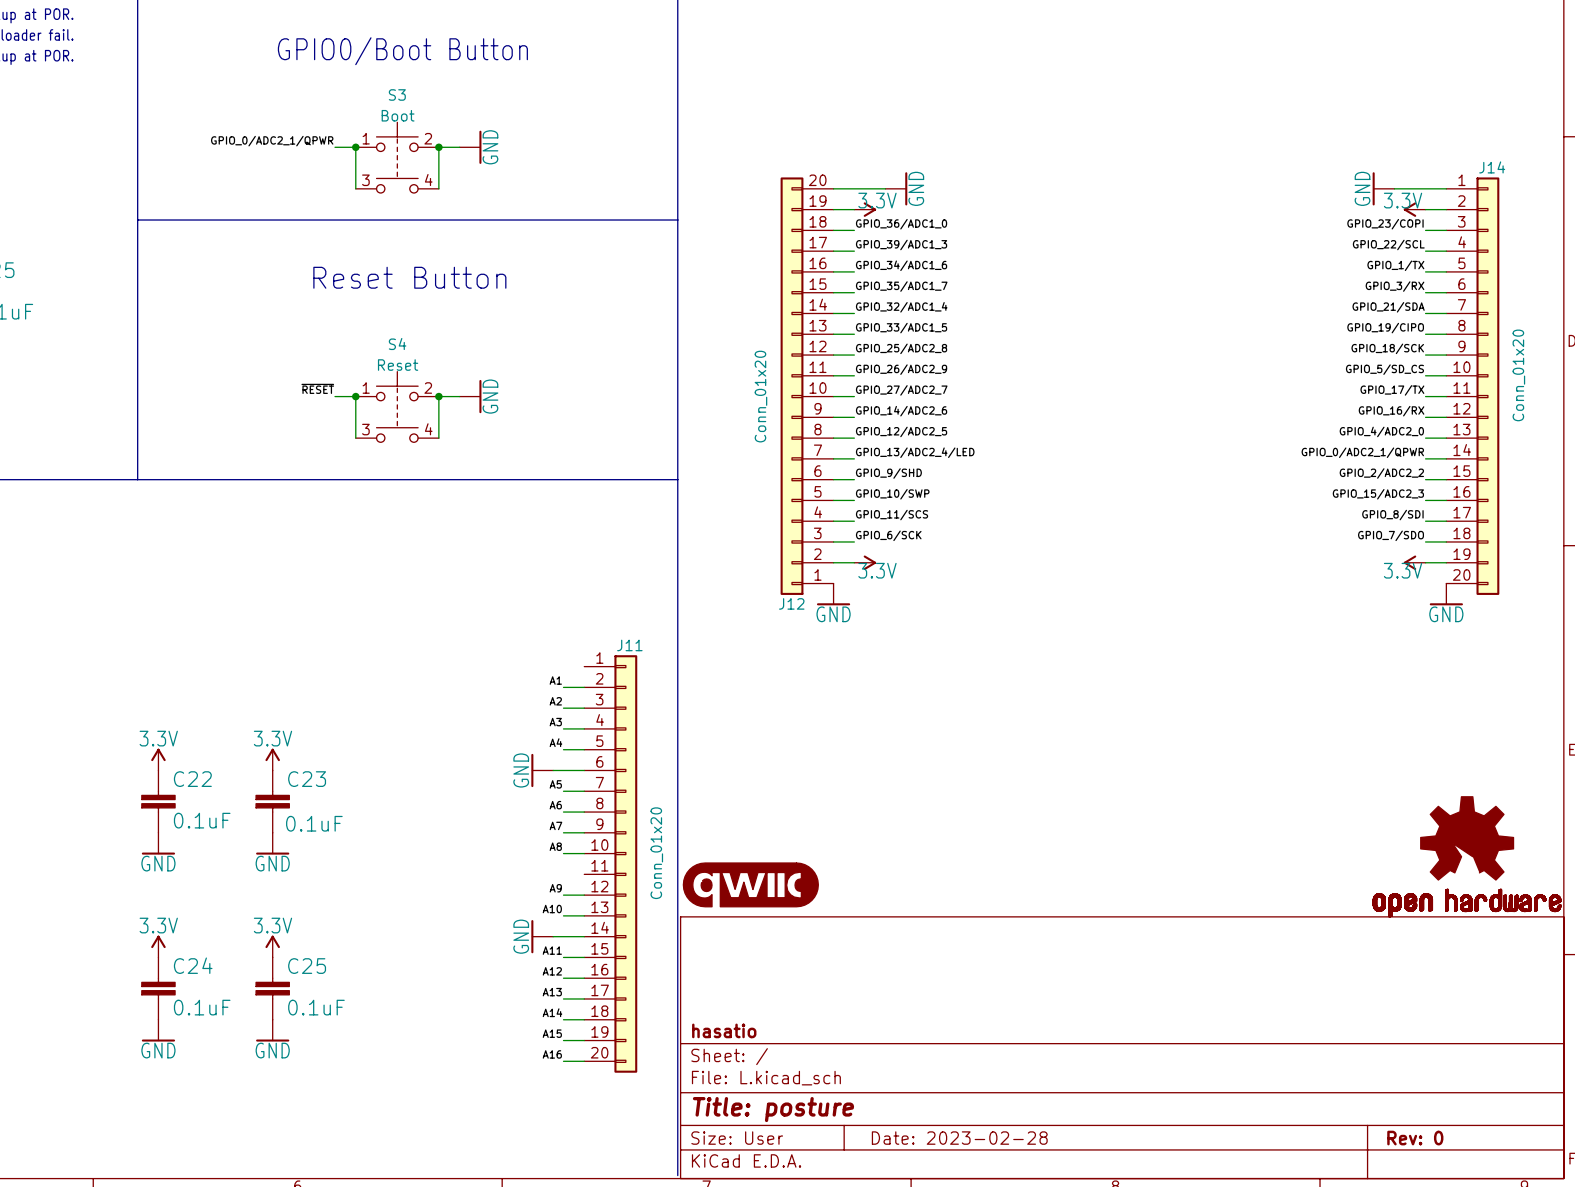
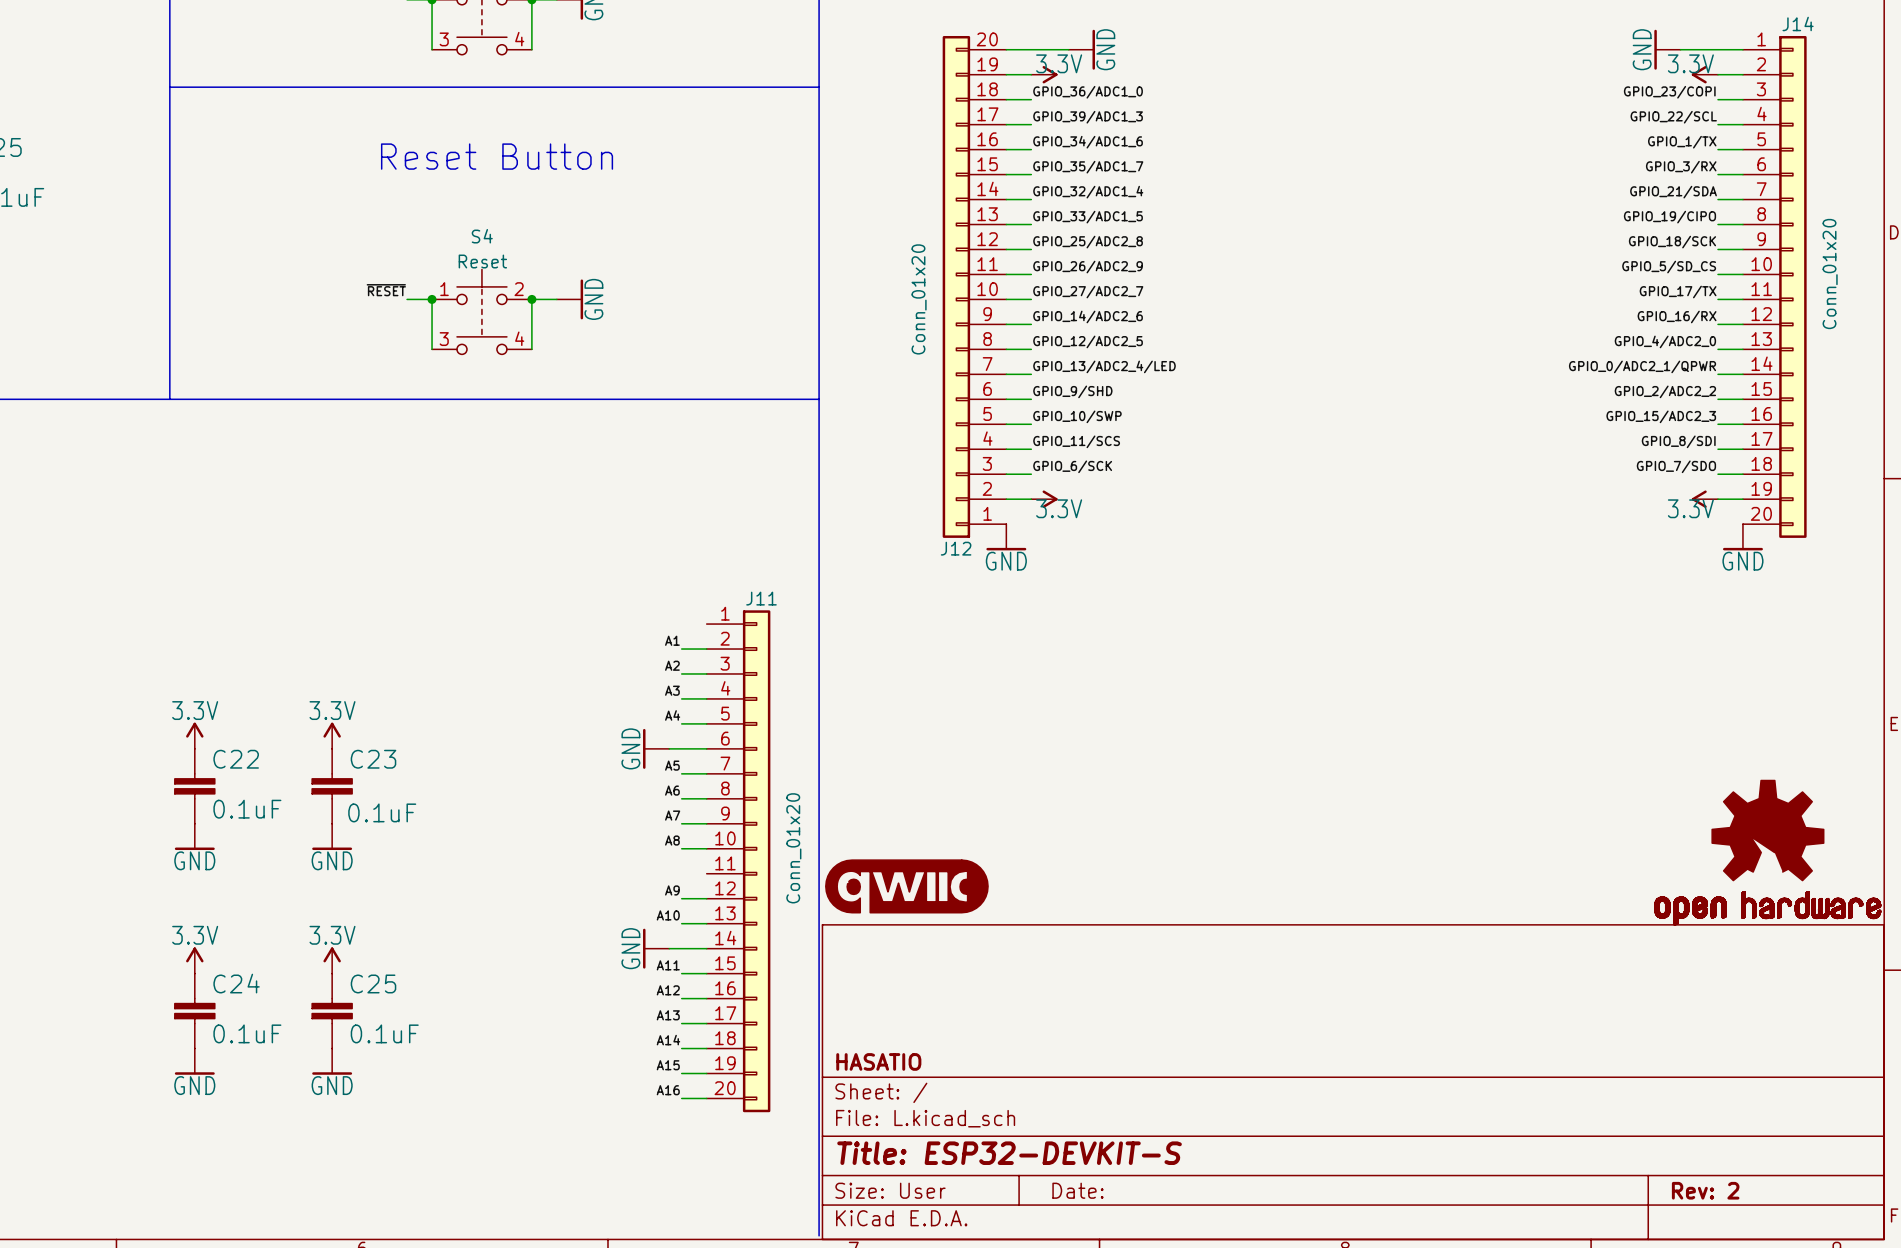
title block: hasatio (724, 1030) -> HASATIO (878, 1061)
title block: Title: posture (773, 1109) -> Title: ESP32-DEVKIT-S (1009, 1153)
title block: Date: 2023-02-28 (959, 1138) -> Date: (1077, 1190)
title block: Rev: 0 (1415, 1138) -> Rev: 2 (1705, 1190)

